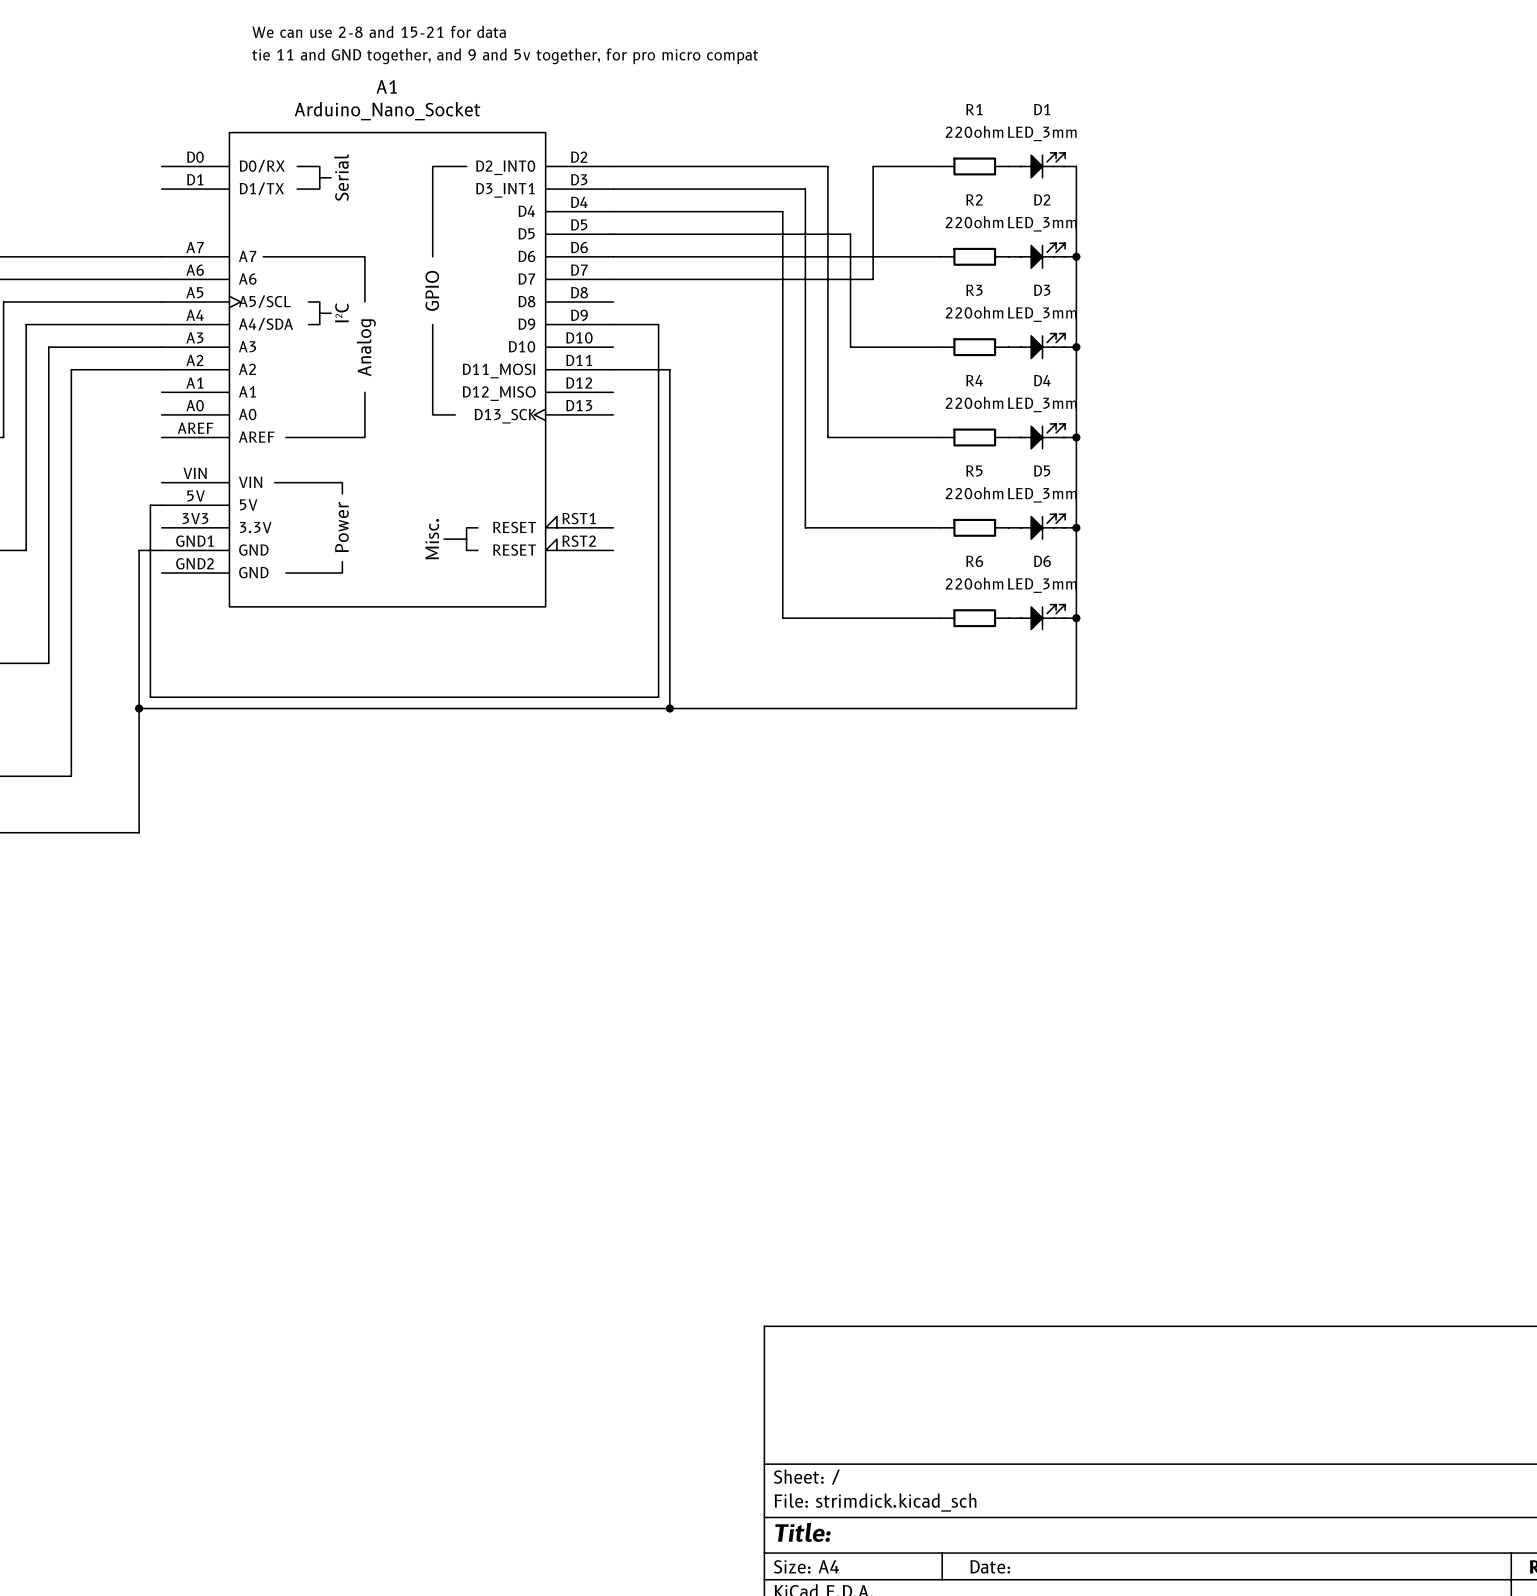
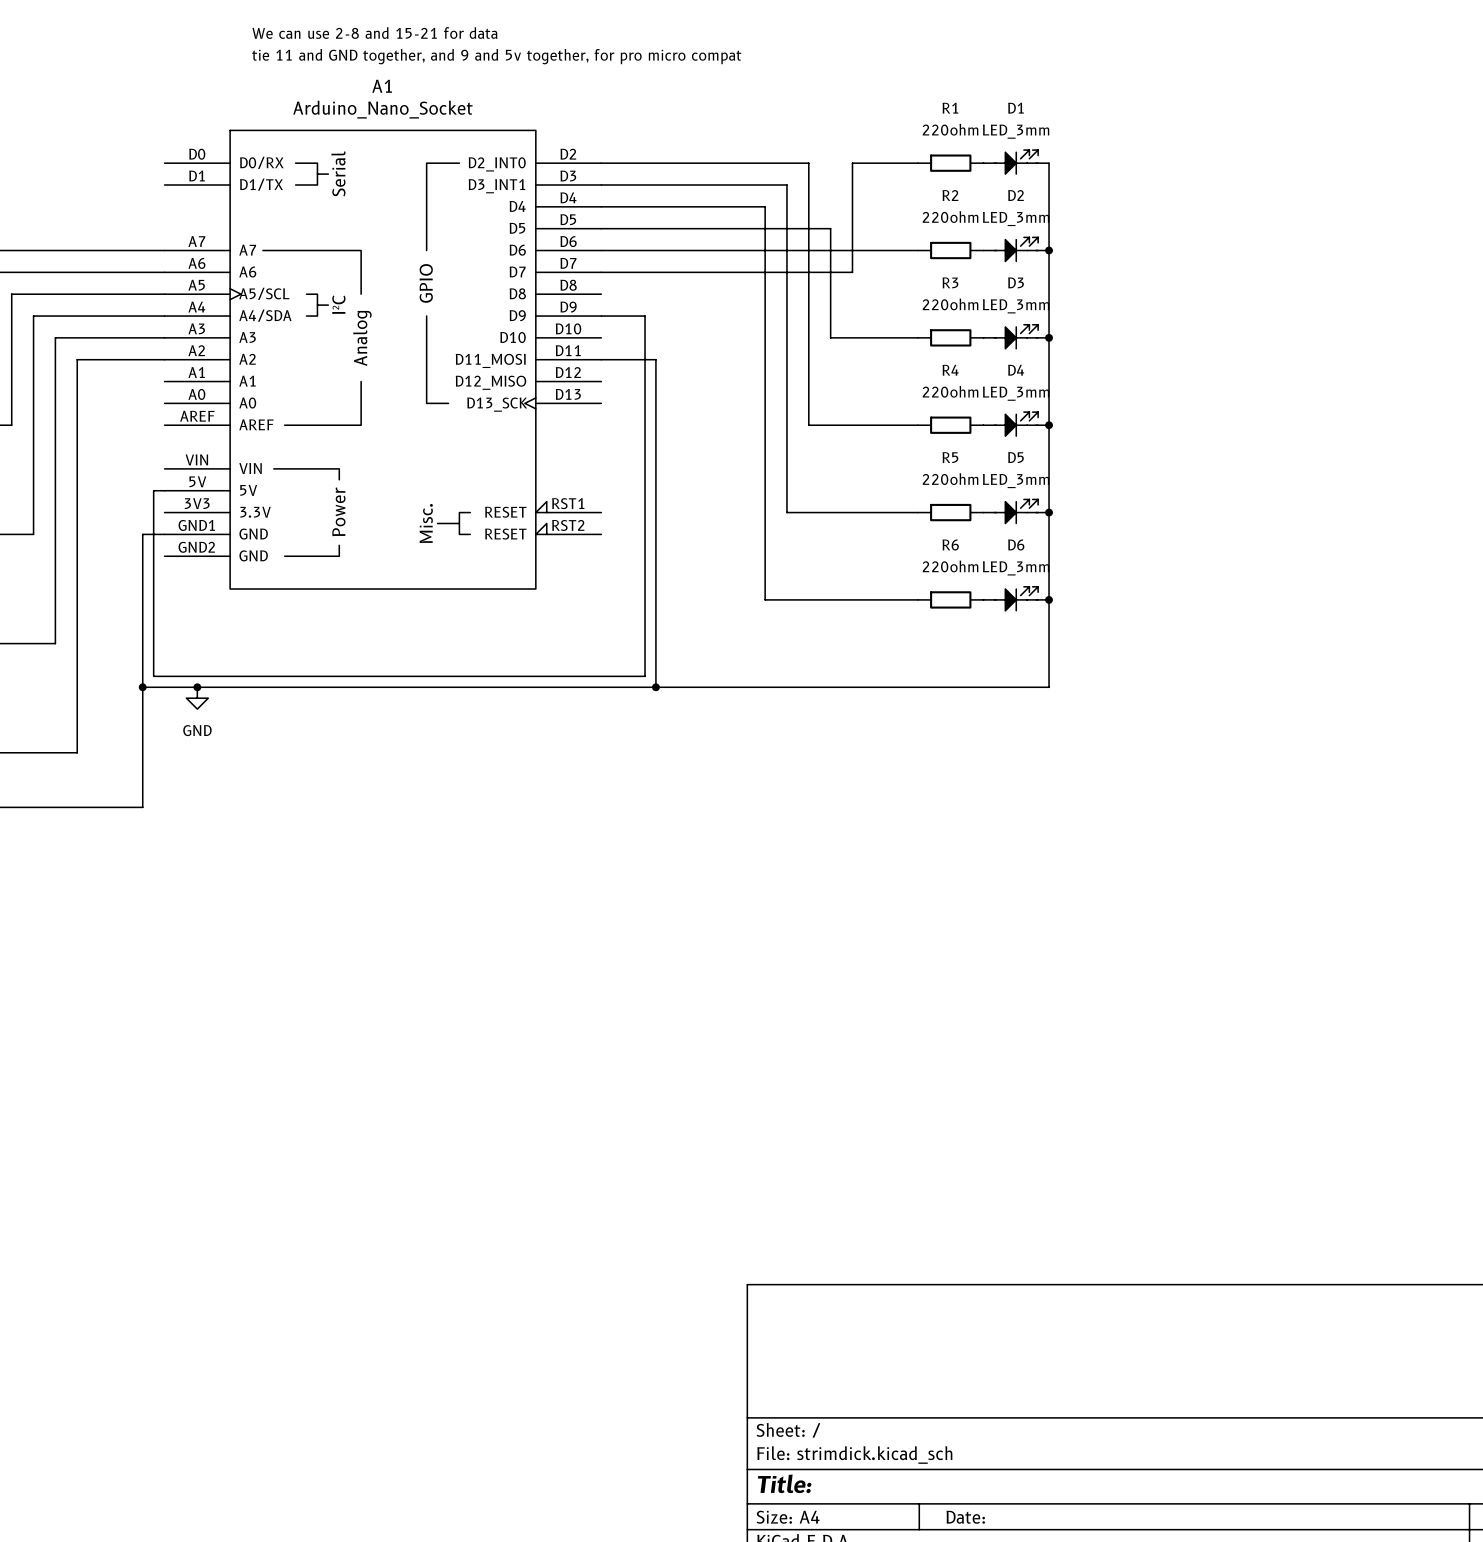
junction: none -> (197, 687)
power symbol: none -> GND (197, 698)

